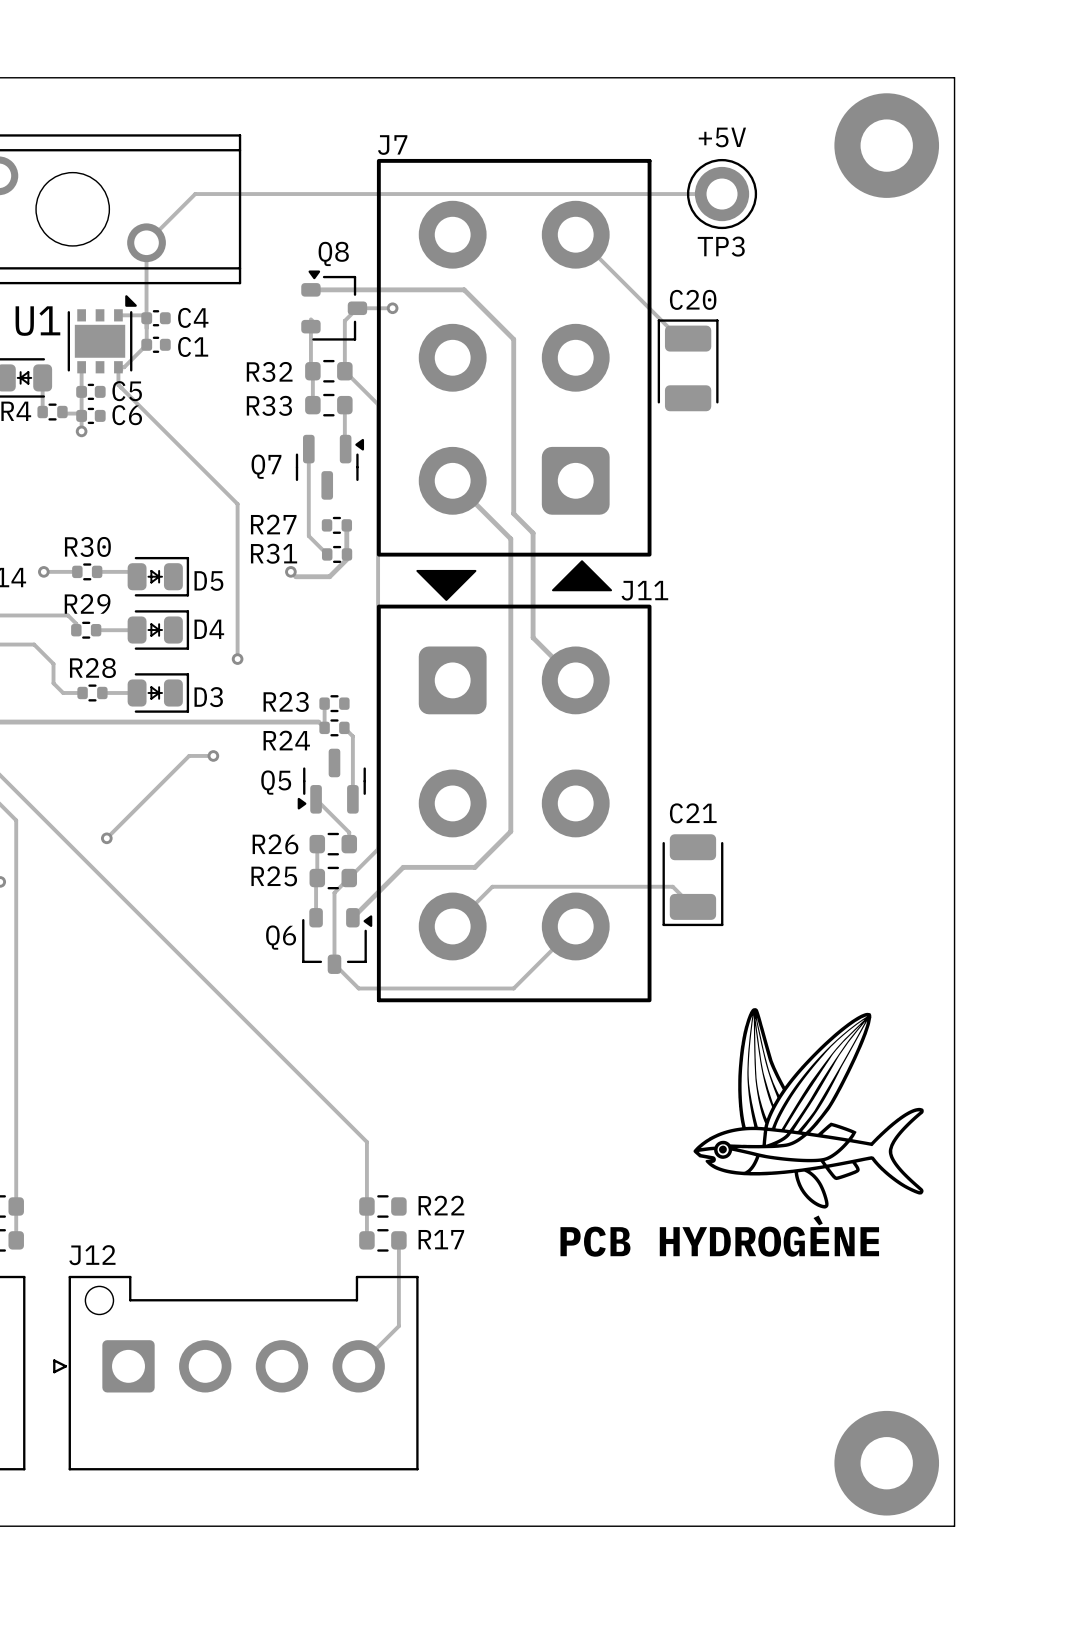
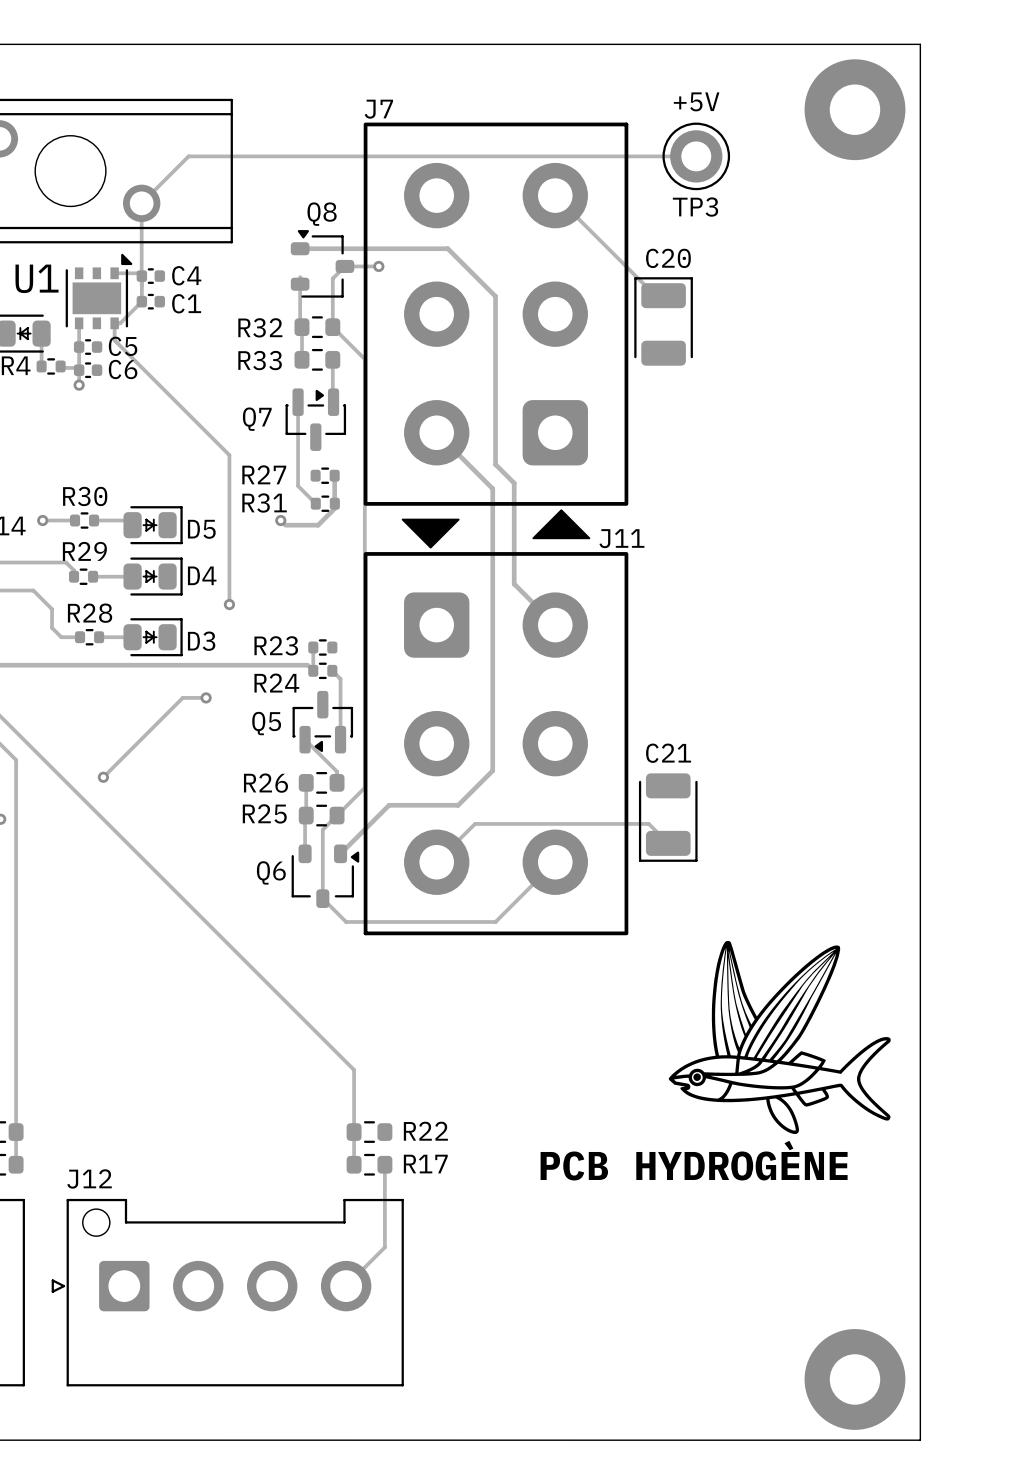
Q7 footprint: [295, 434, 365, 500] -> [285, 388, 347, 451]
Q5 footprint: [297, 748, 366, 814] -> [292, 690, 354, 754]

